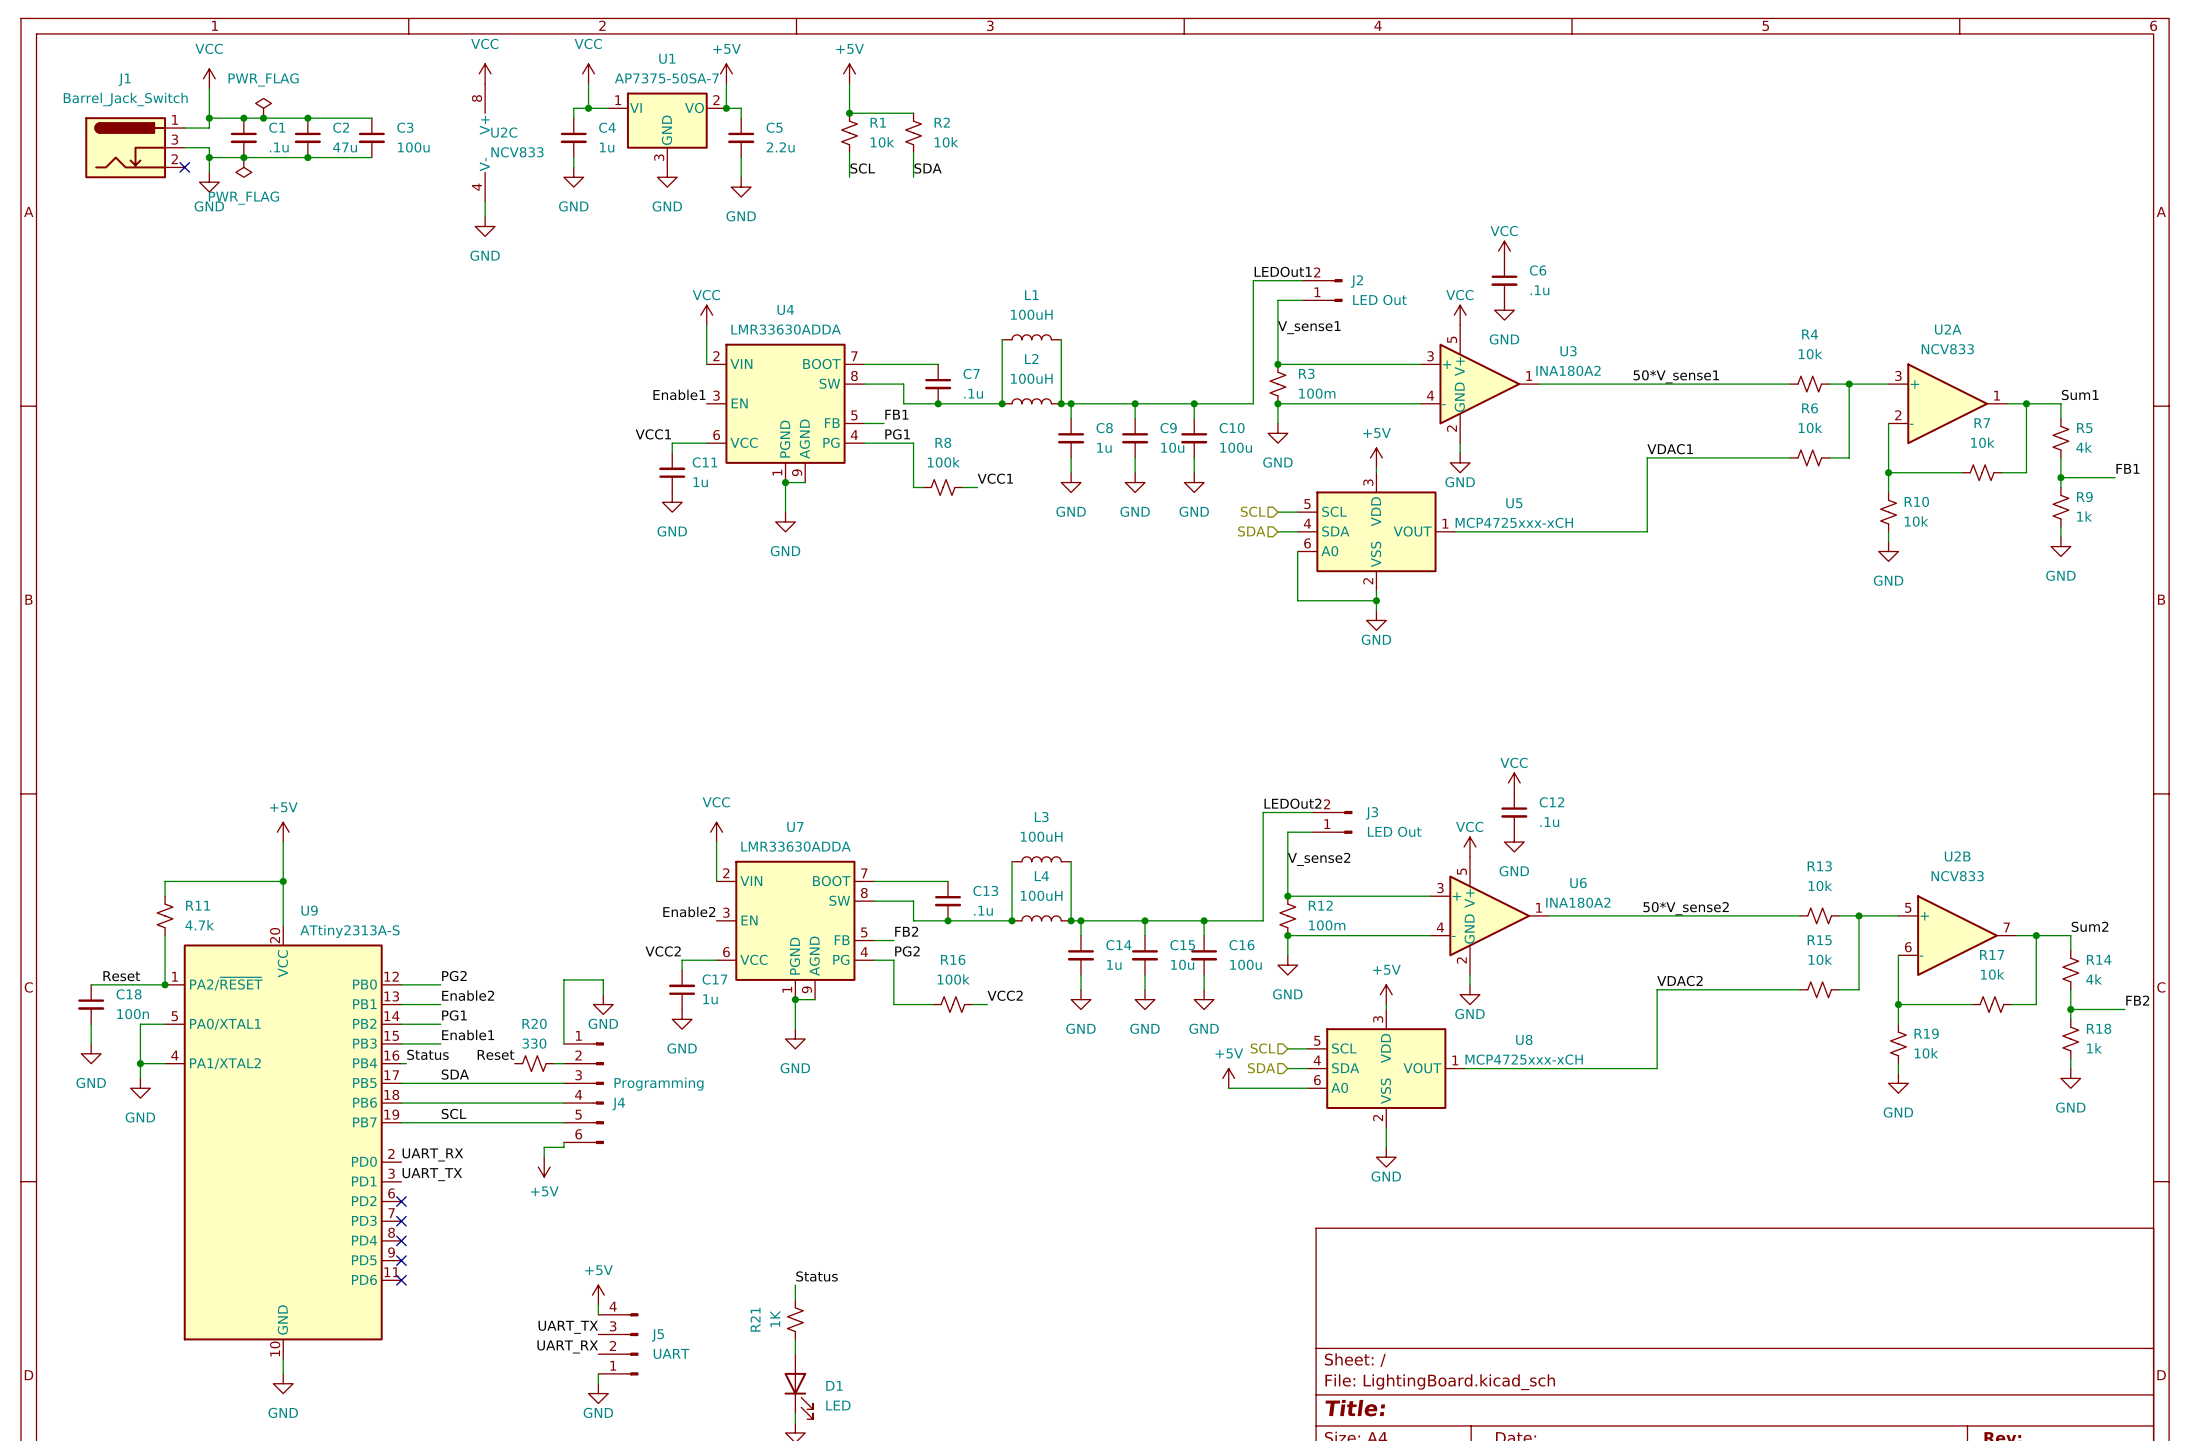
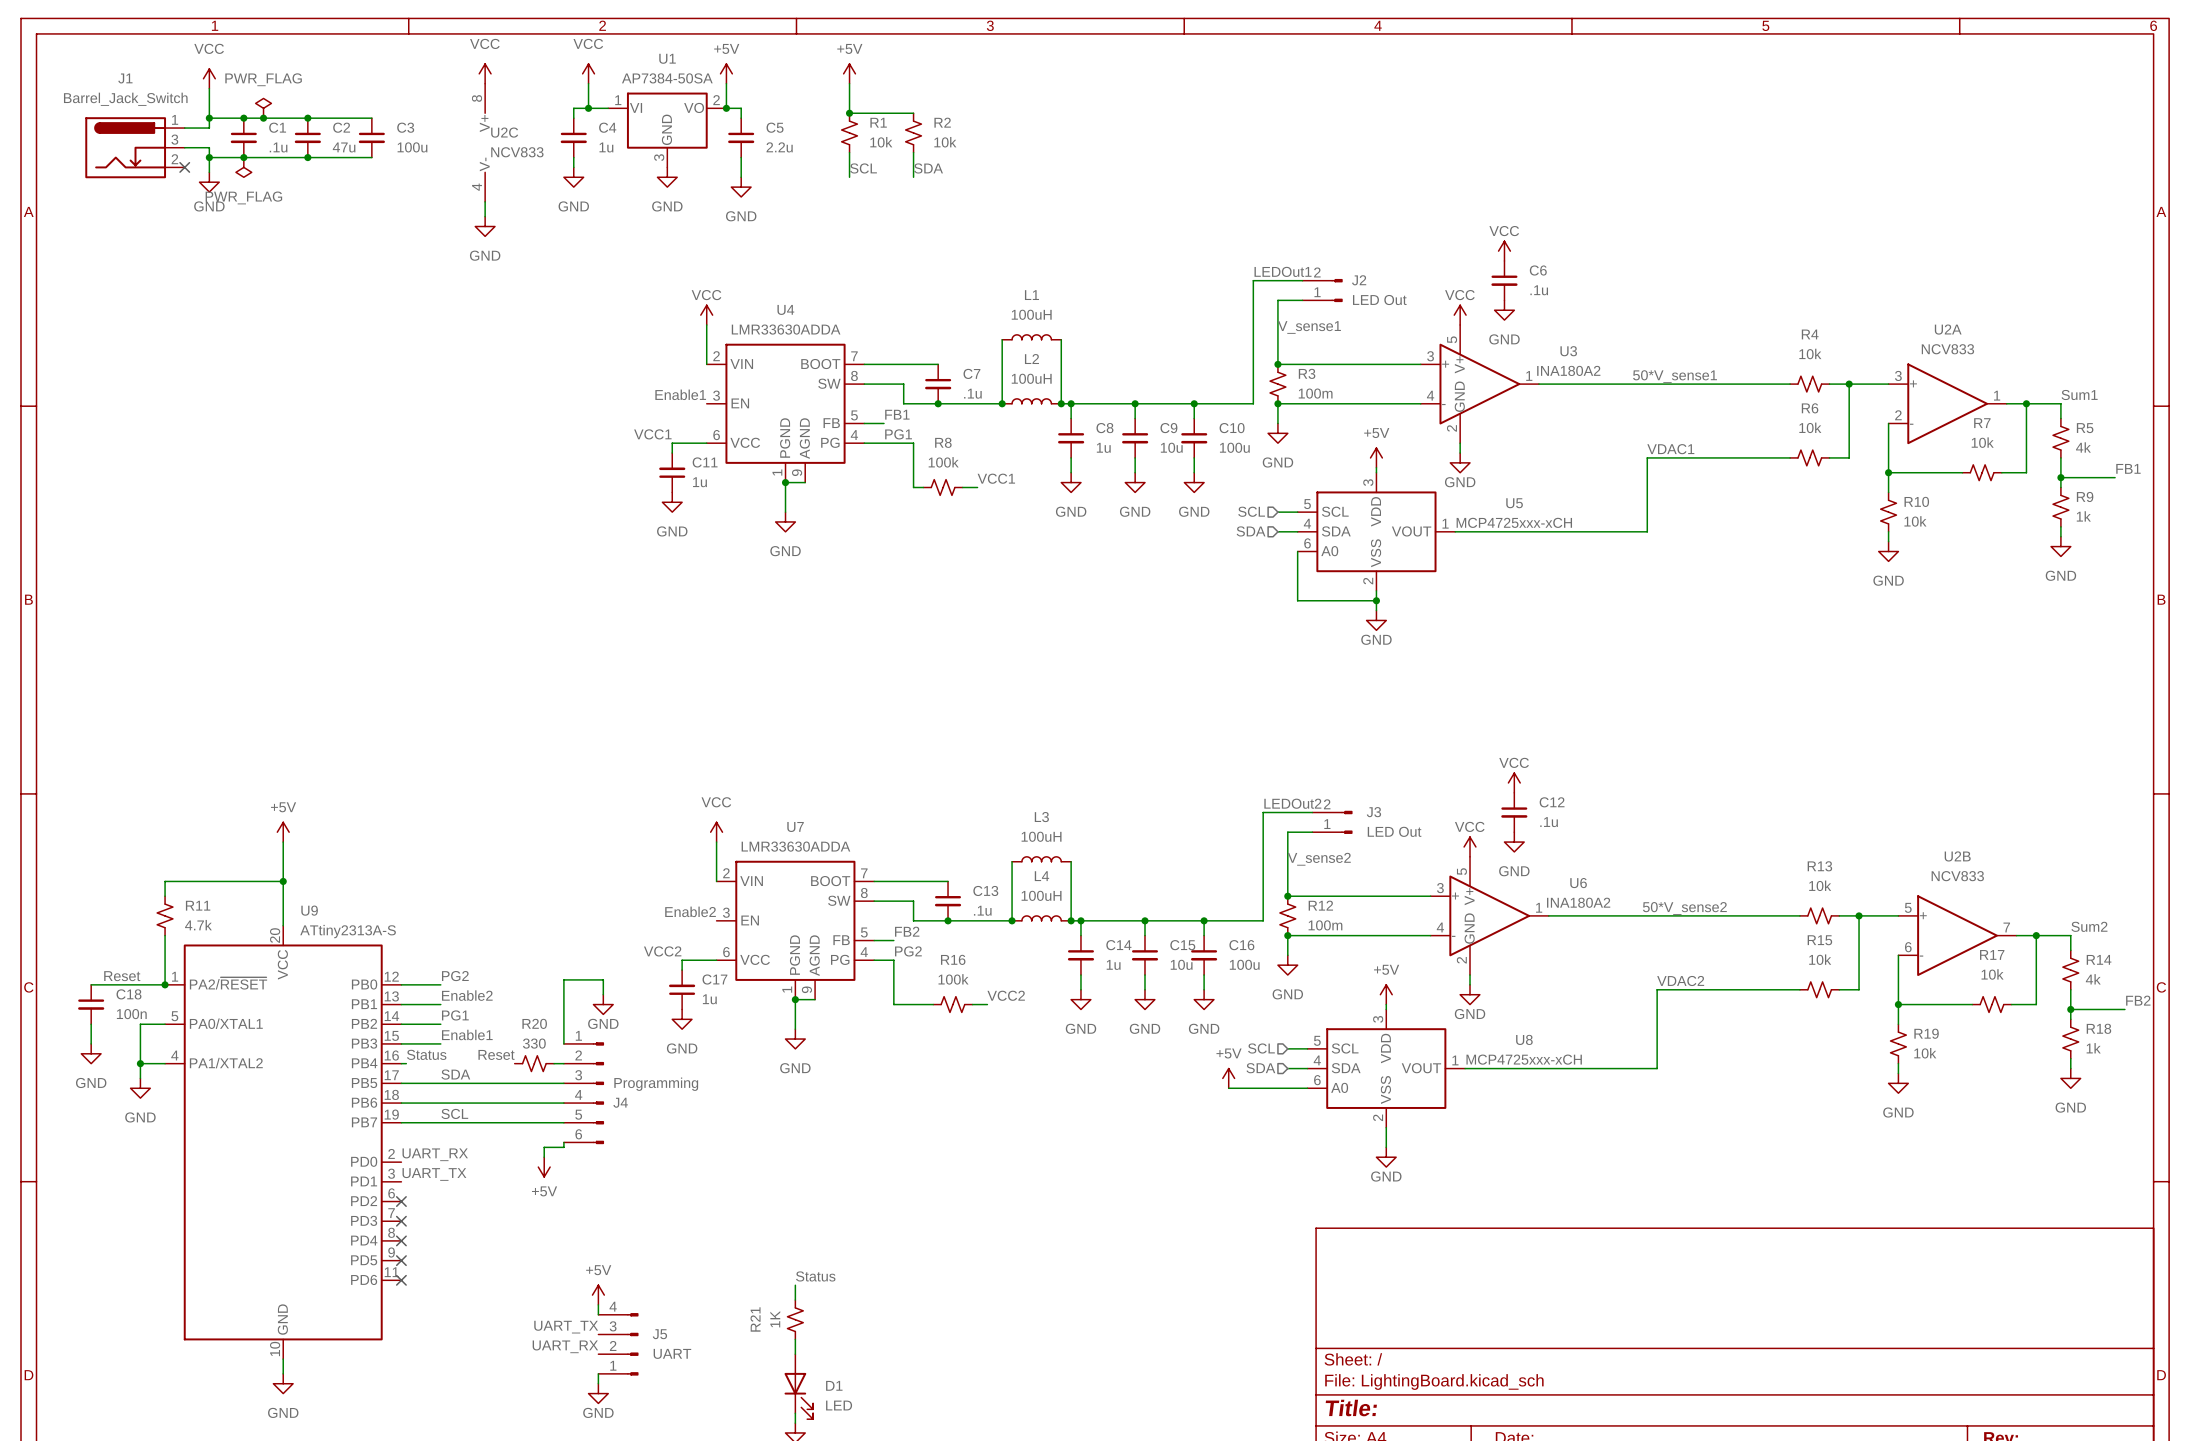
U1 value: AP7375-50SA-7 (666, 78) -> AP7384-50SA (667, 78)

